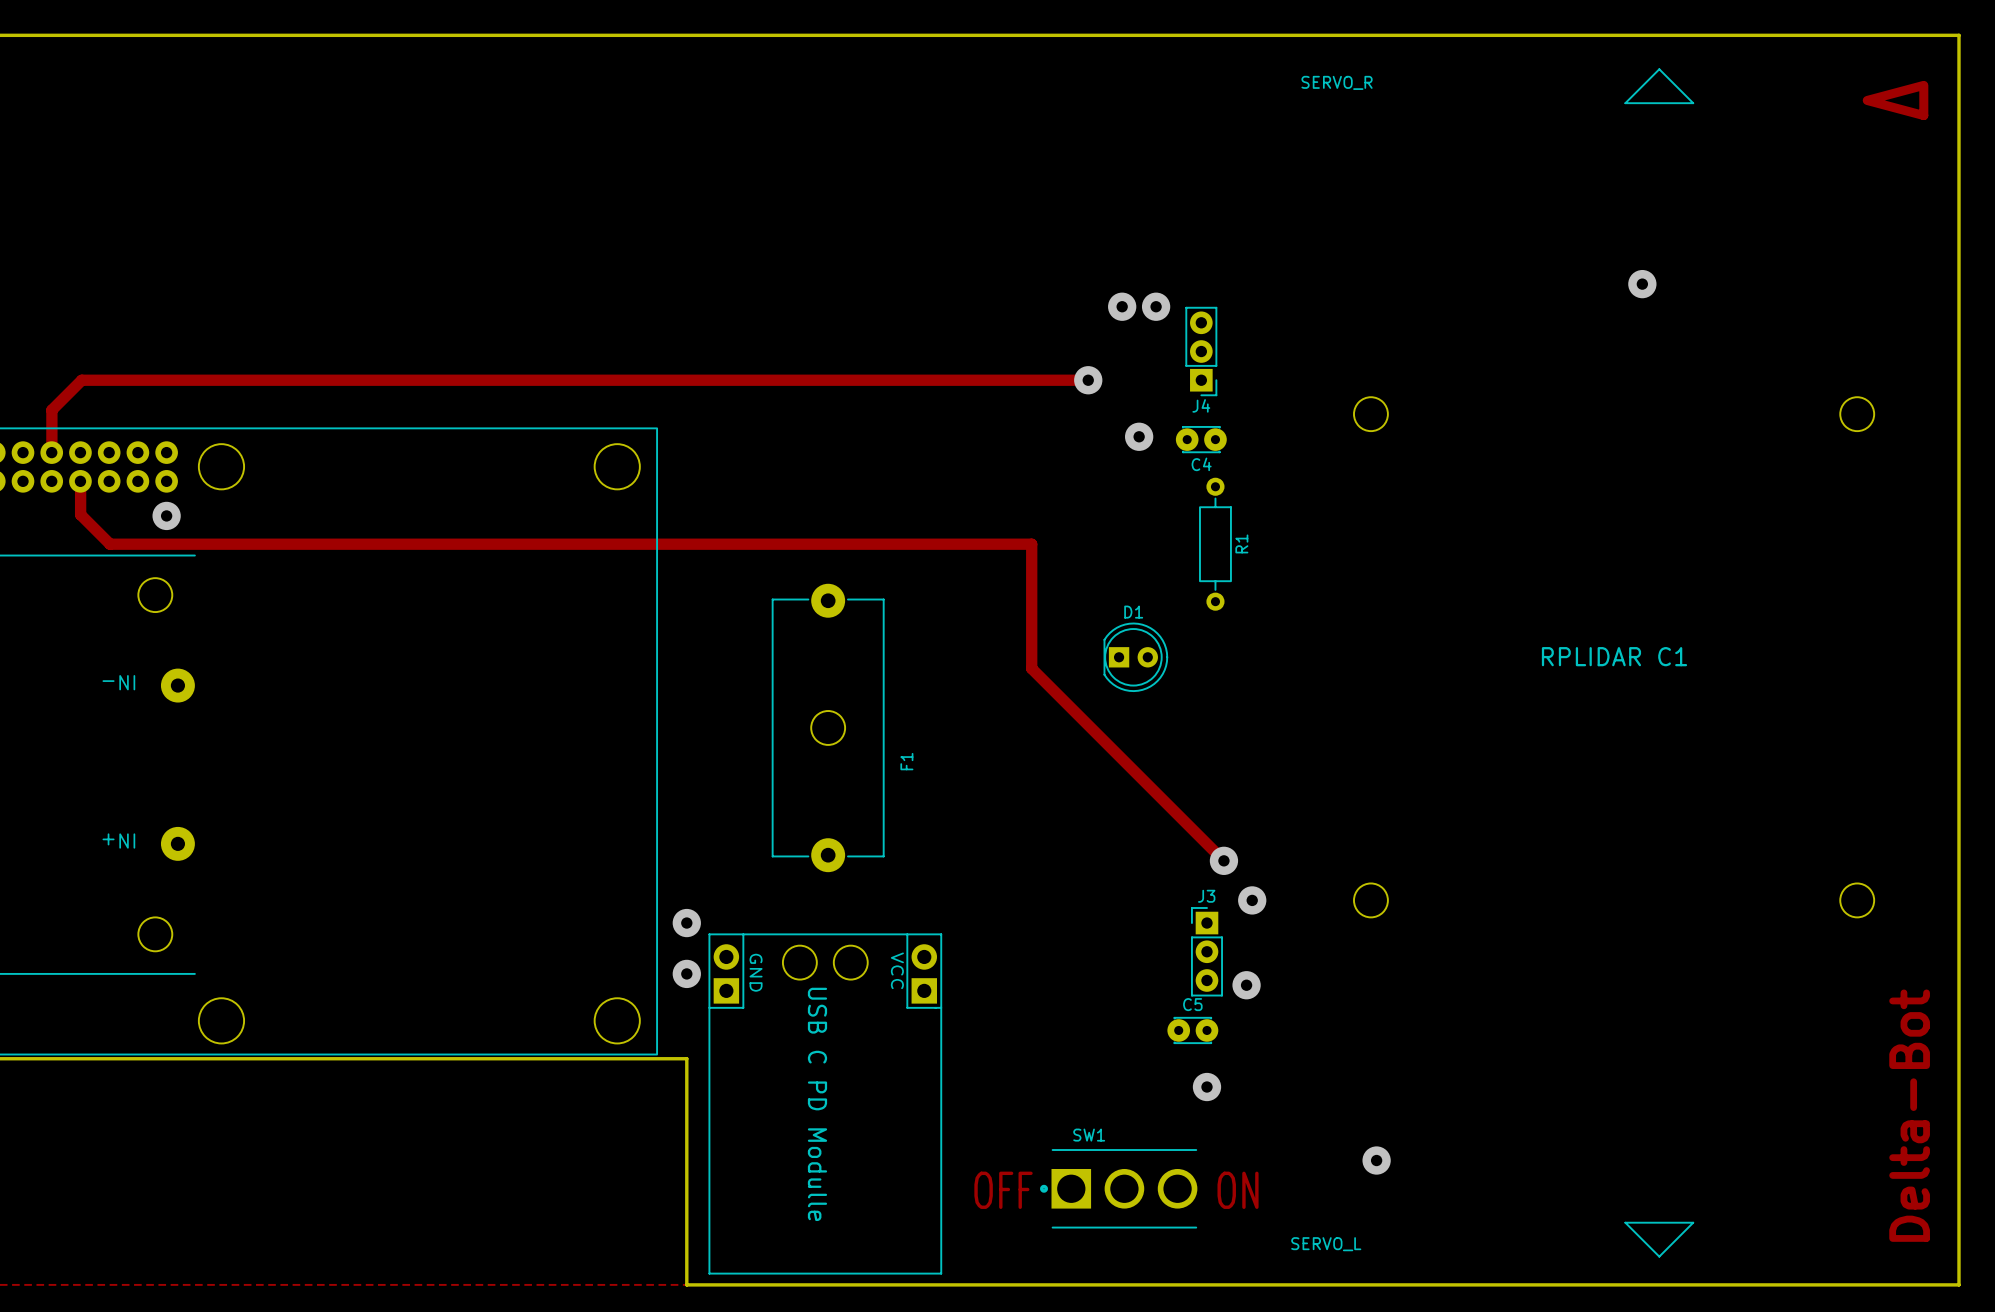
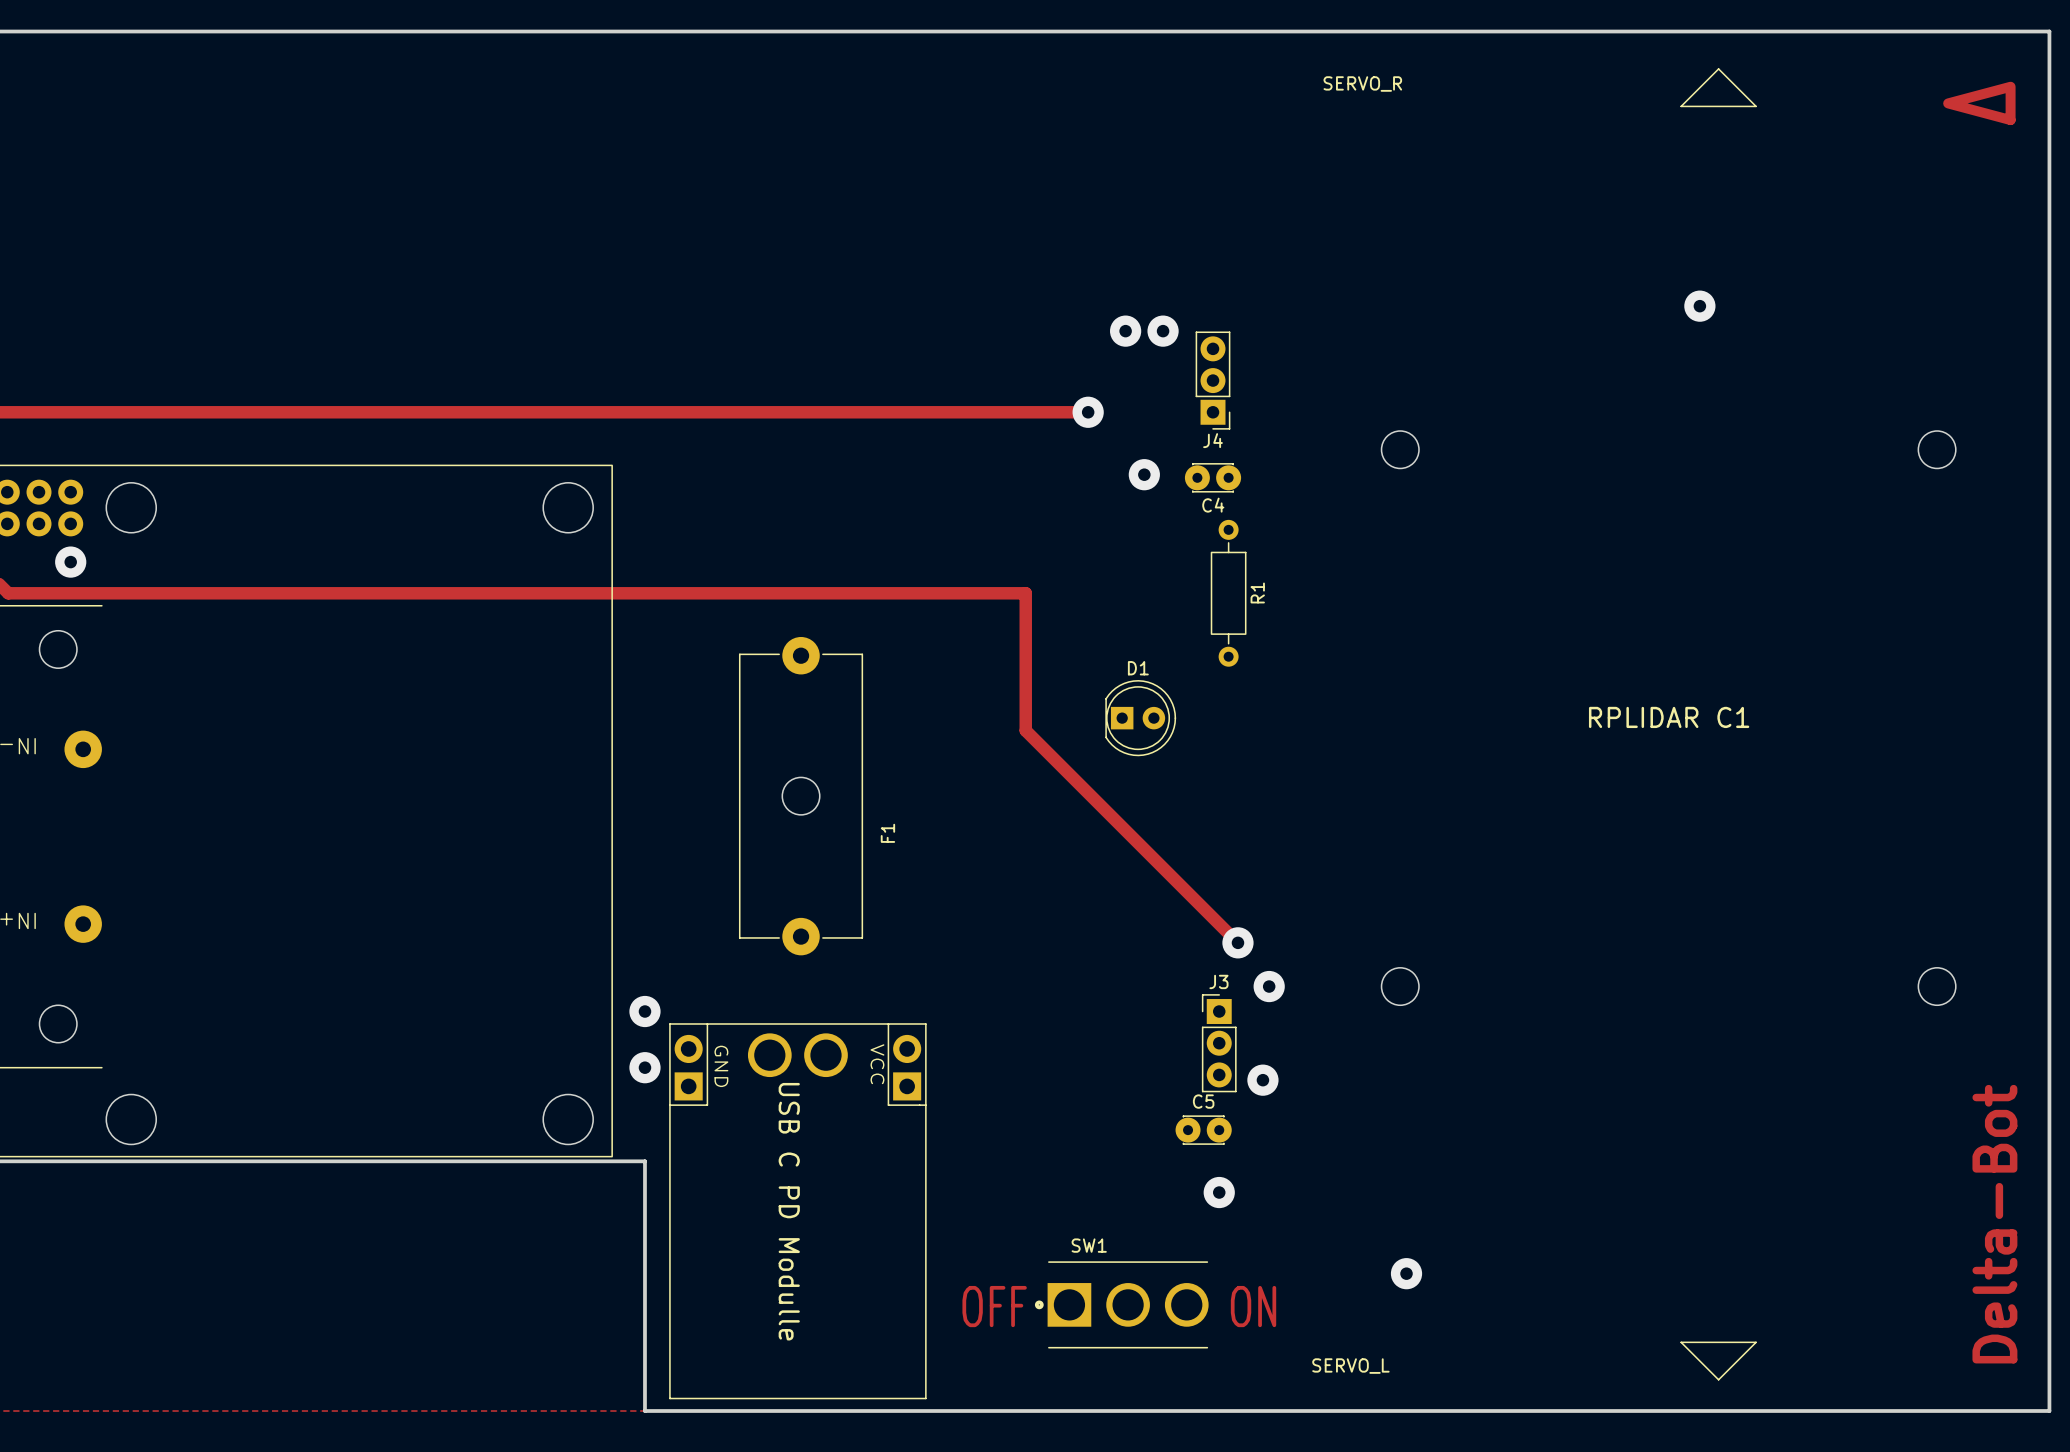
part footprint: [708, 933, 942, 1275] -> [669, 1023, 927, 1400]

